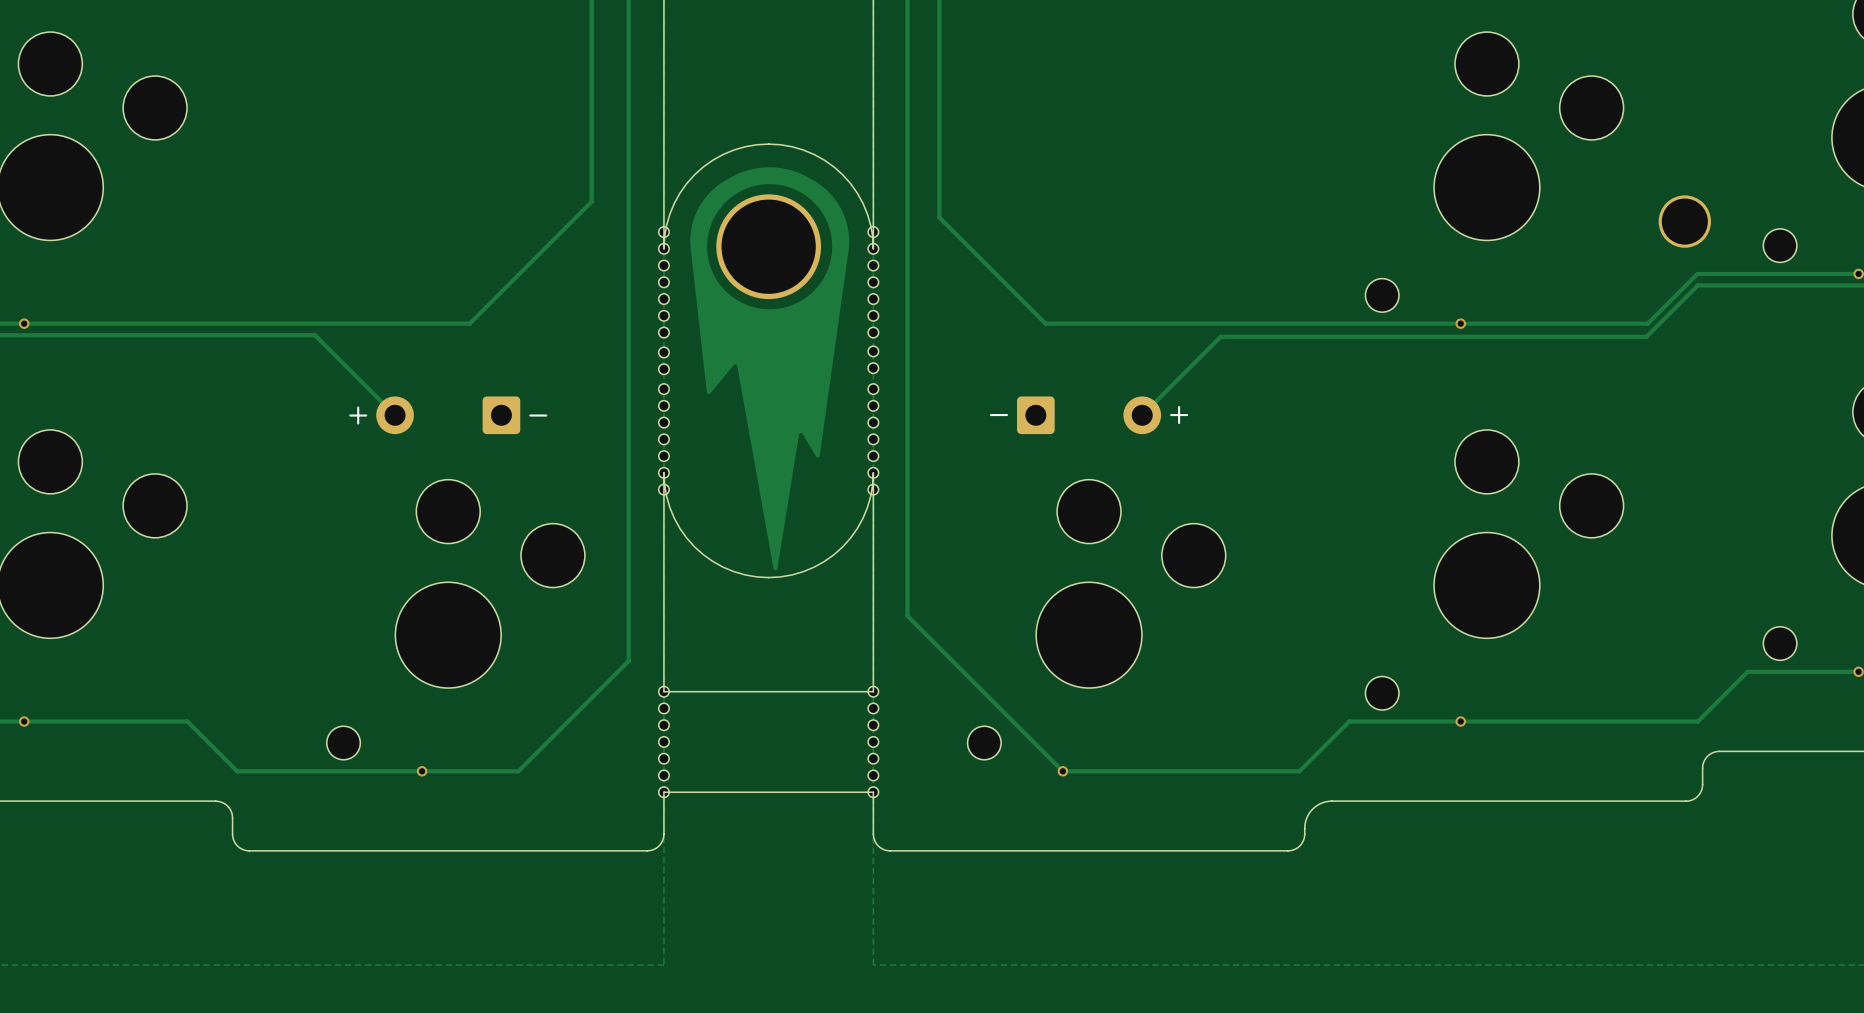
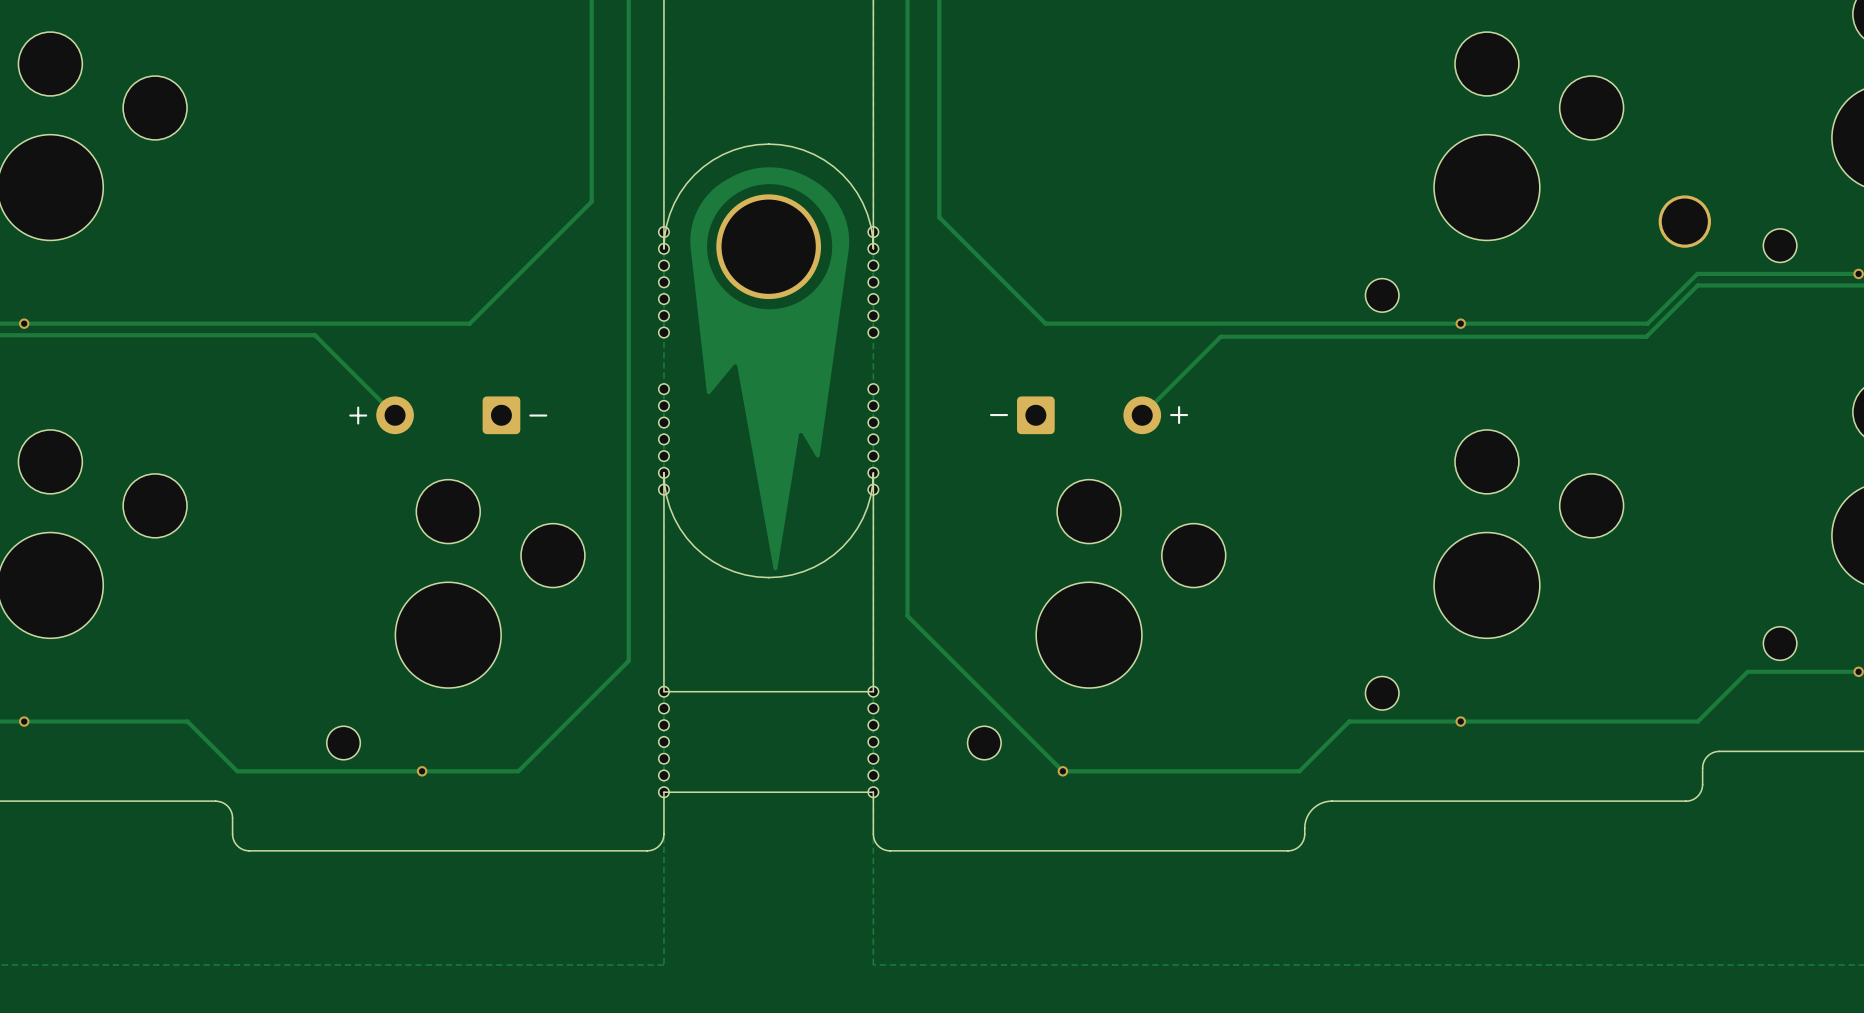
part: (873, 351) -> none
part: (663, 352) -> none
part: (873, 368) -> none
part: (663, 369) -> none

